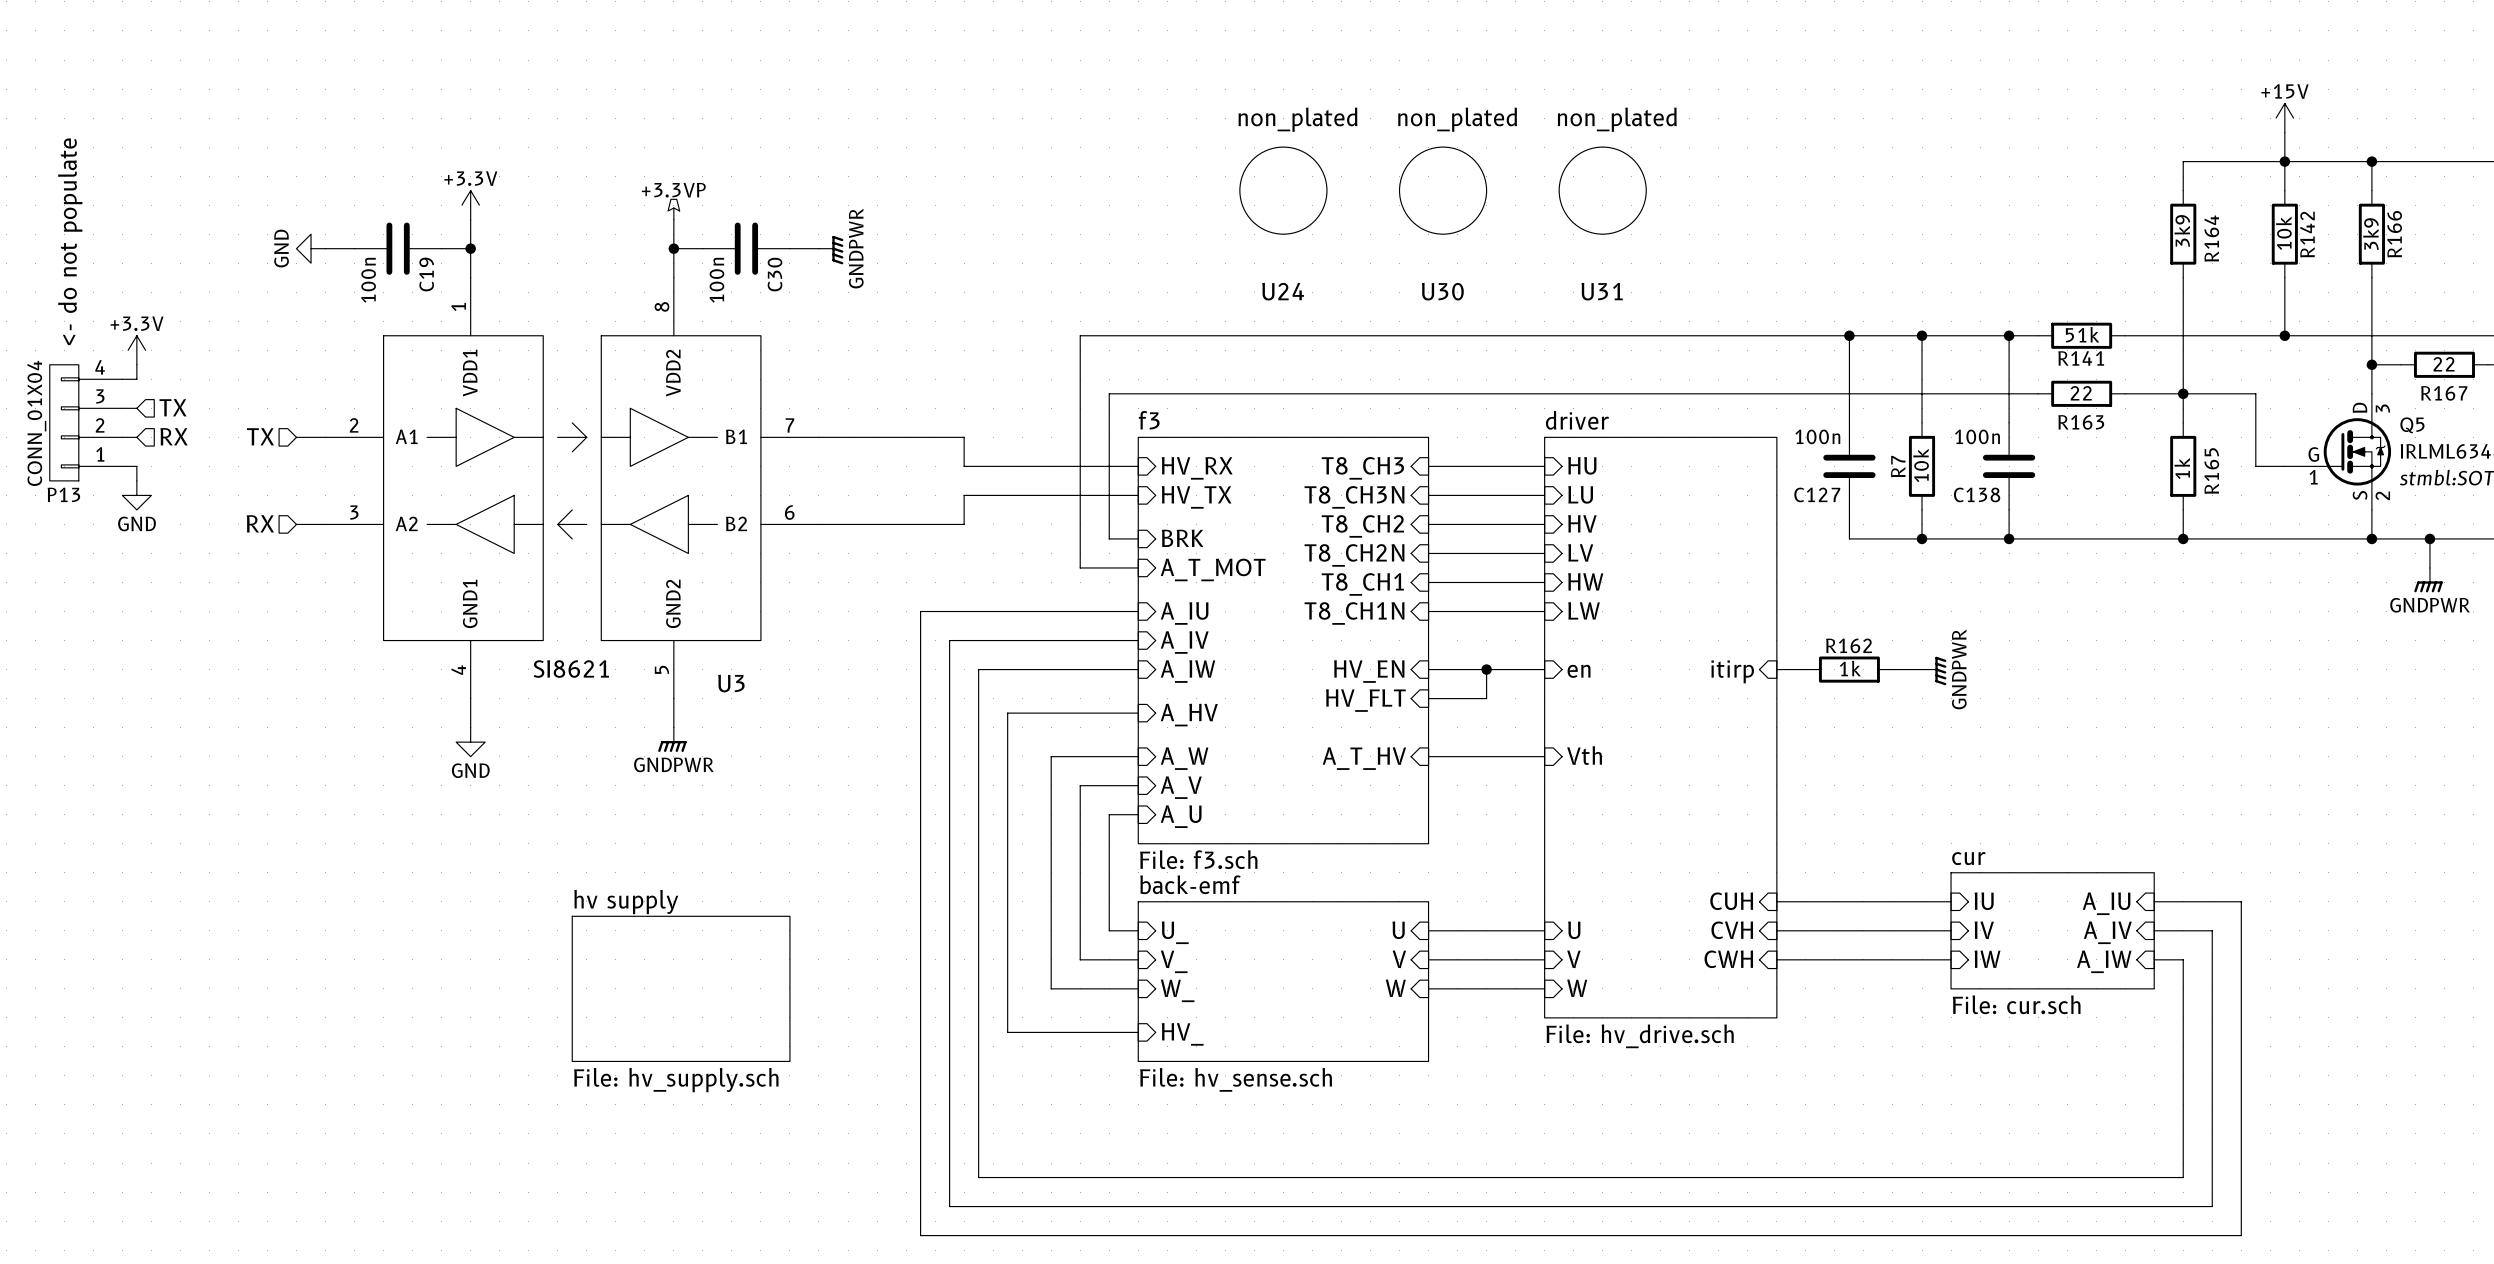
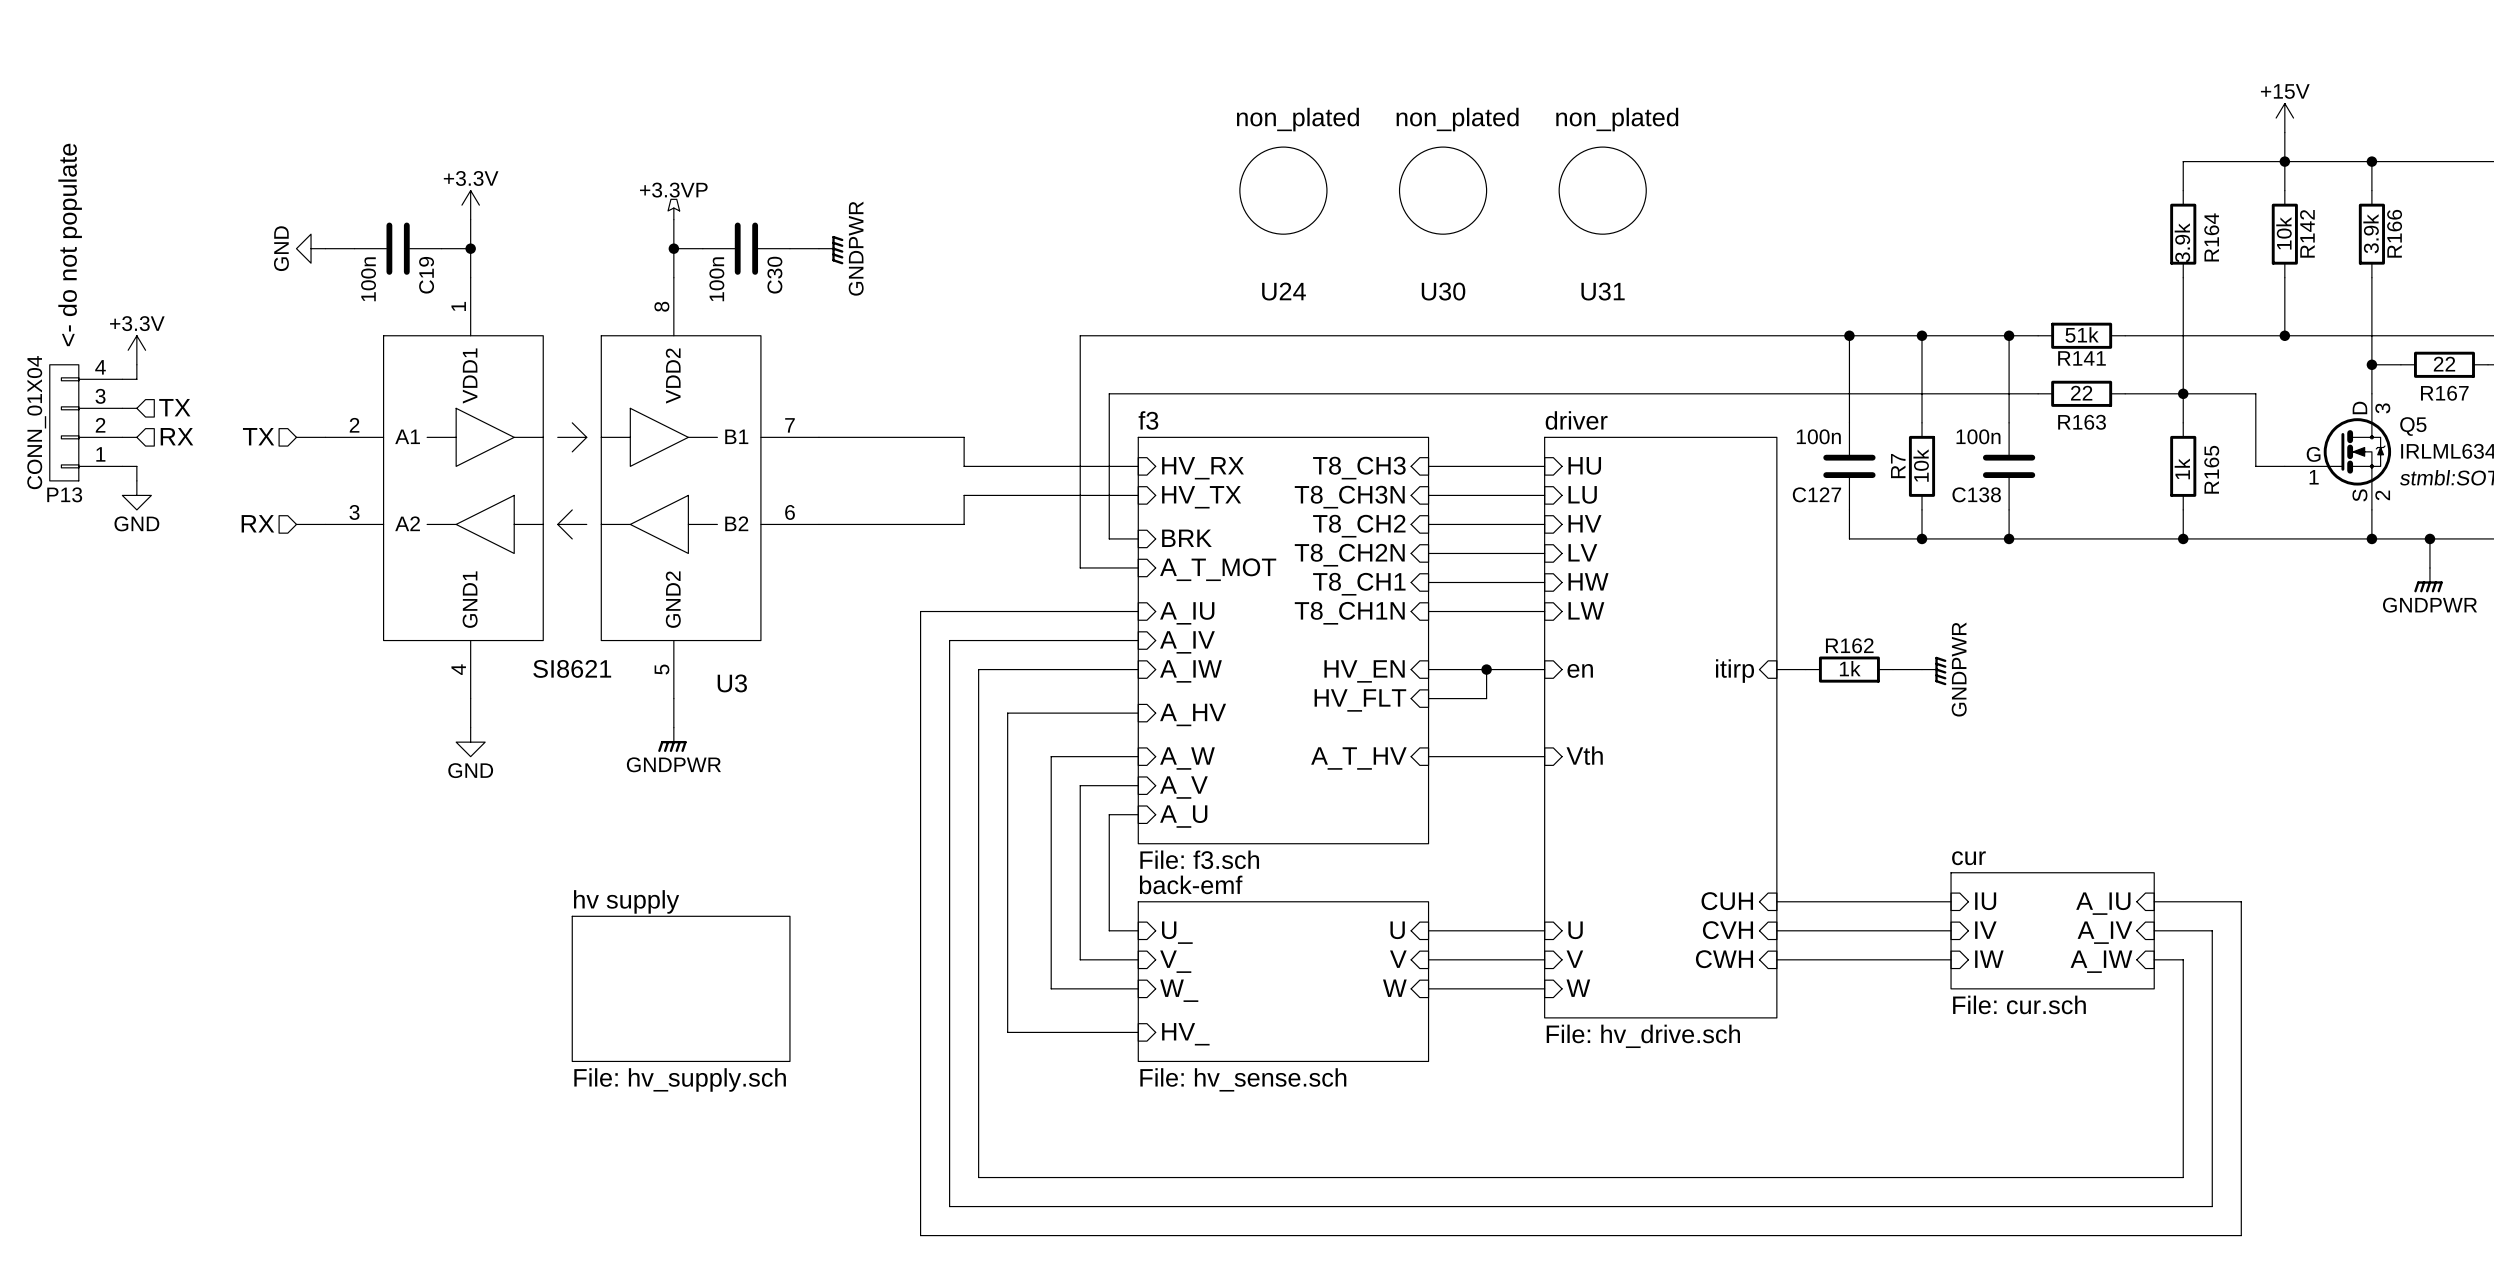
R164 value: 3k9 (2182, 230) -> 3.9k (2182, 242)
R166 value: 3k9 (2370, 234) -> 3.9k (2371, 233)

